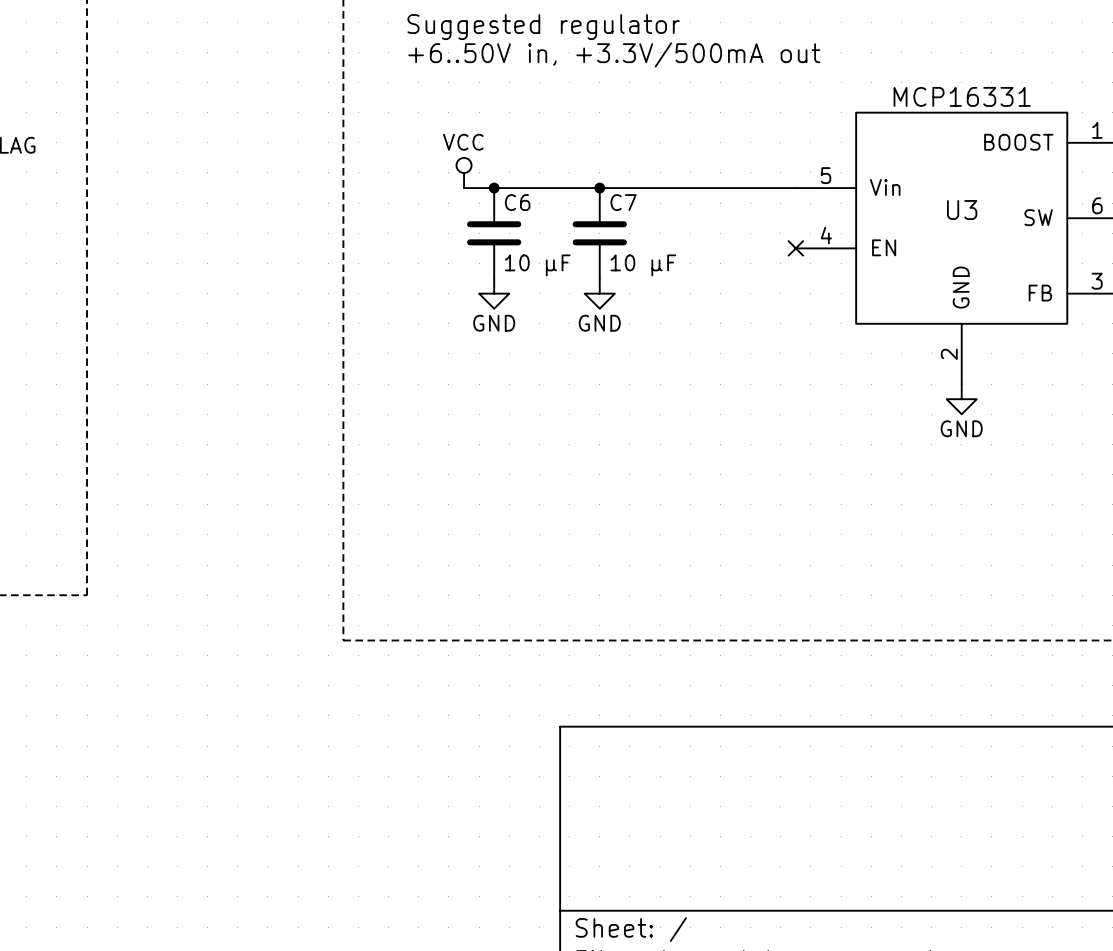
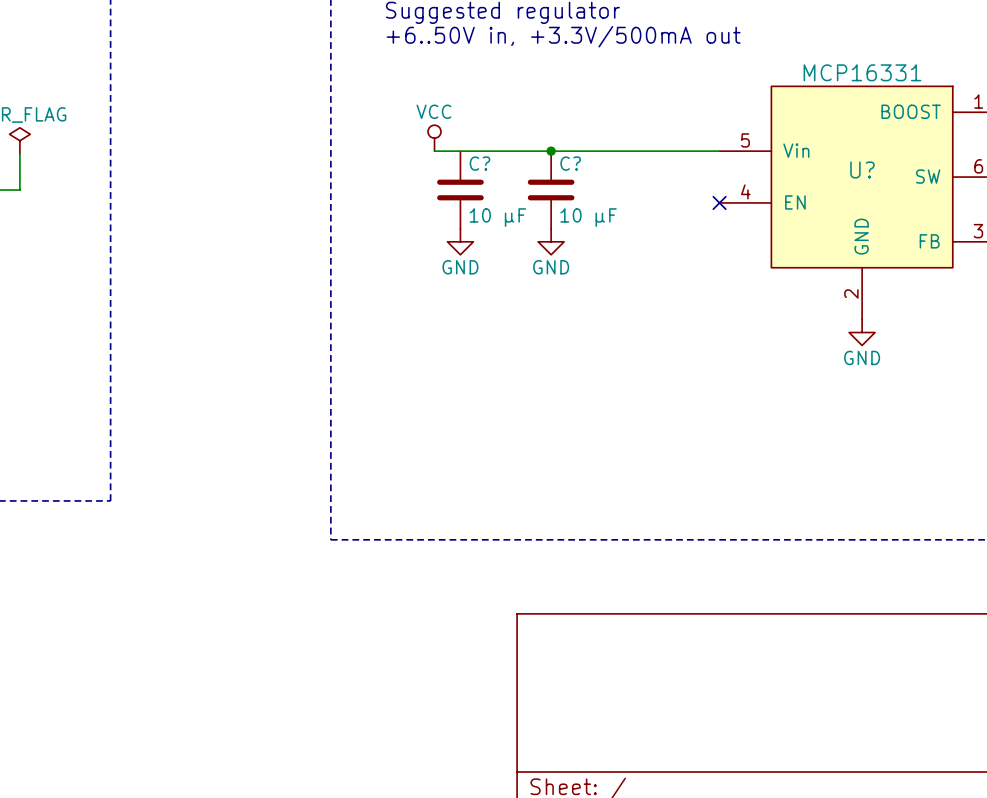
junction: (494, 188) -> none
C6 name: C6 (517, 202) -> C? (479, 163)
C7 name: C7 (623, 202) -> C? (570, 163)
U3 name: U3 (962, 210) -> U? (862, 169)

